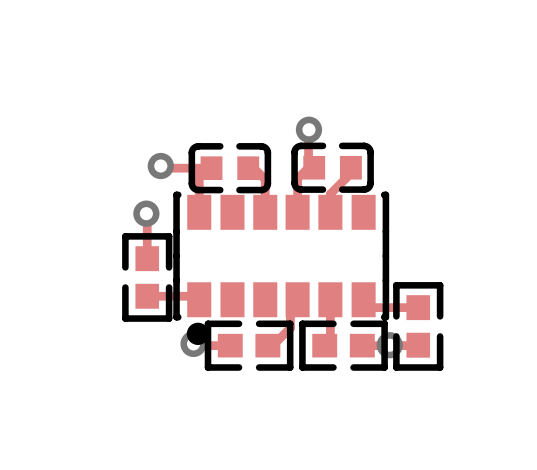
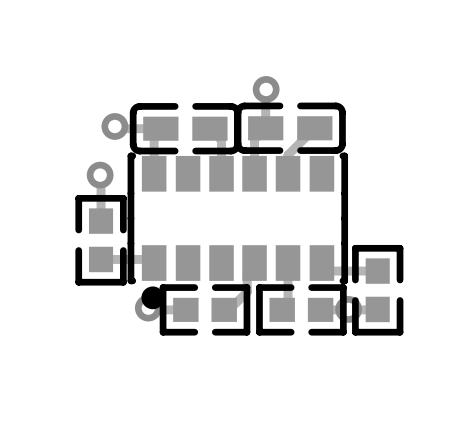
part footprint: [291, 142, 374, 193] -> [234, 102, 346, 154]
part footprint: [188, 143, 272, 194] -> [129, 103, 241, 155]

